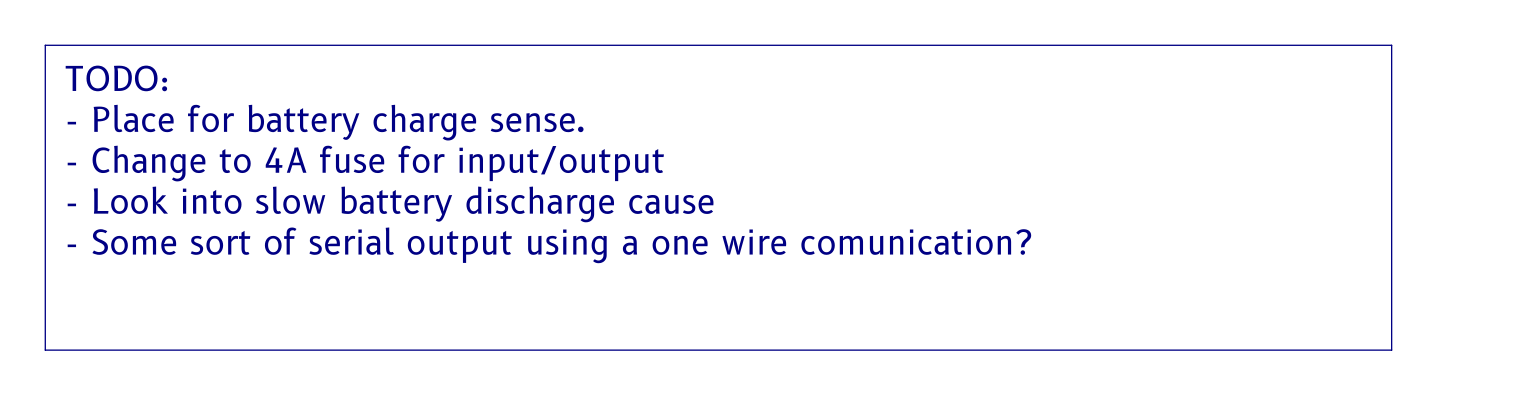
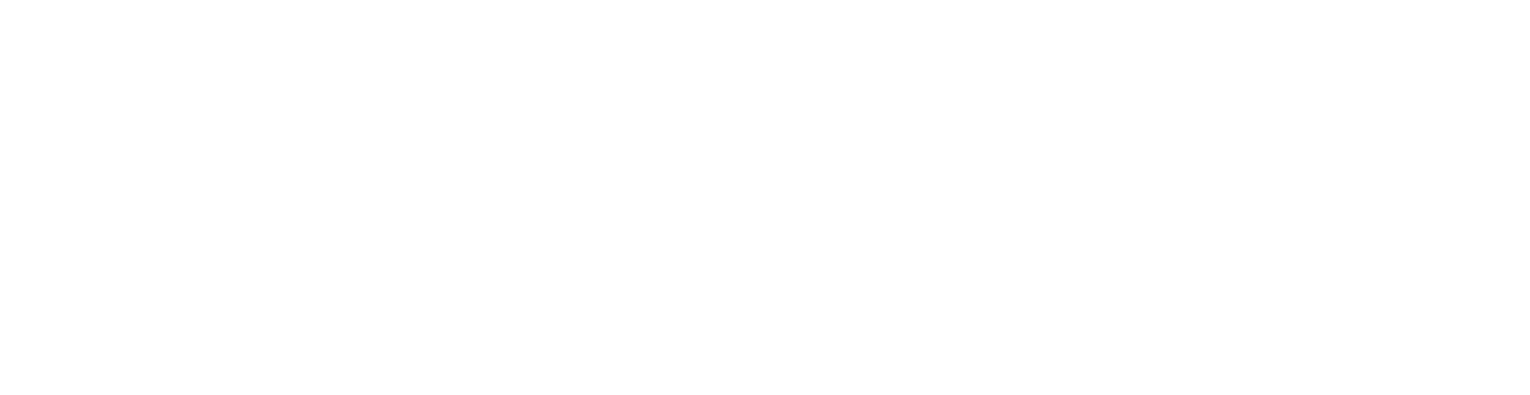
line: (45, 45) (1391, 45) (1391, 350) (45, 350) (45, 45) -> none
text: TODO: (116, 78) -> none
text: - Place for battery charge sense. (325, 122) -> none
text: - Change to 4A fuse for input/output (365, 163) -> none
text: - Look into slow battery discharge cause (390, 204) -> none
text: - Some sort of serial output using a one wire comunication? (549, 245) -> none

